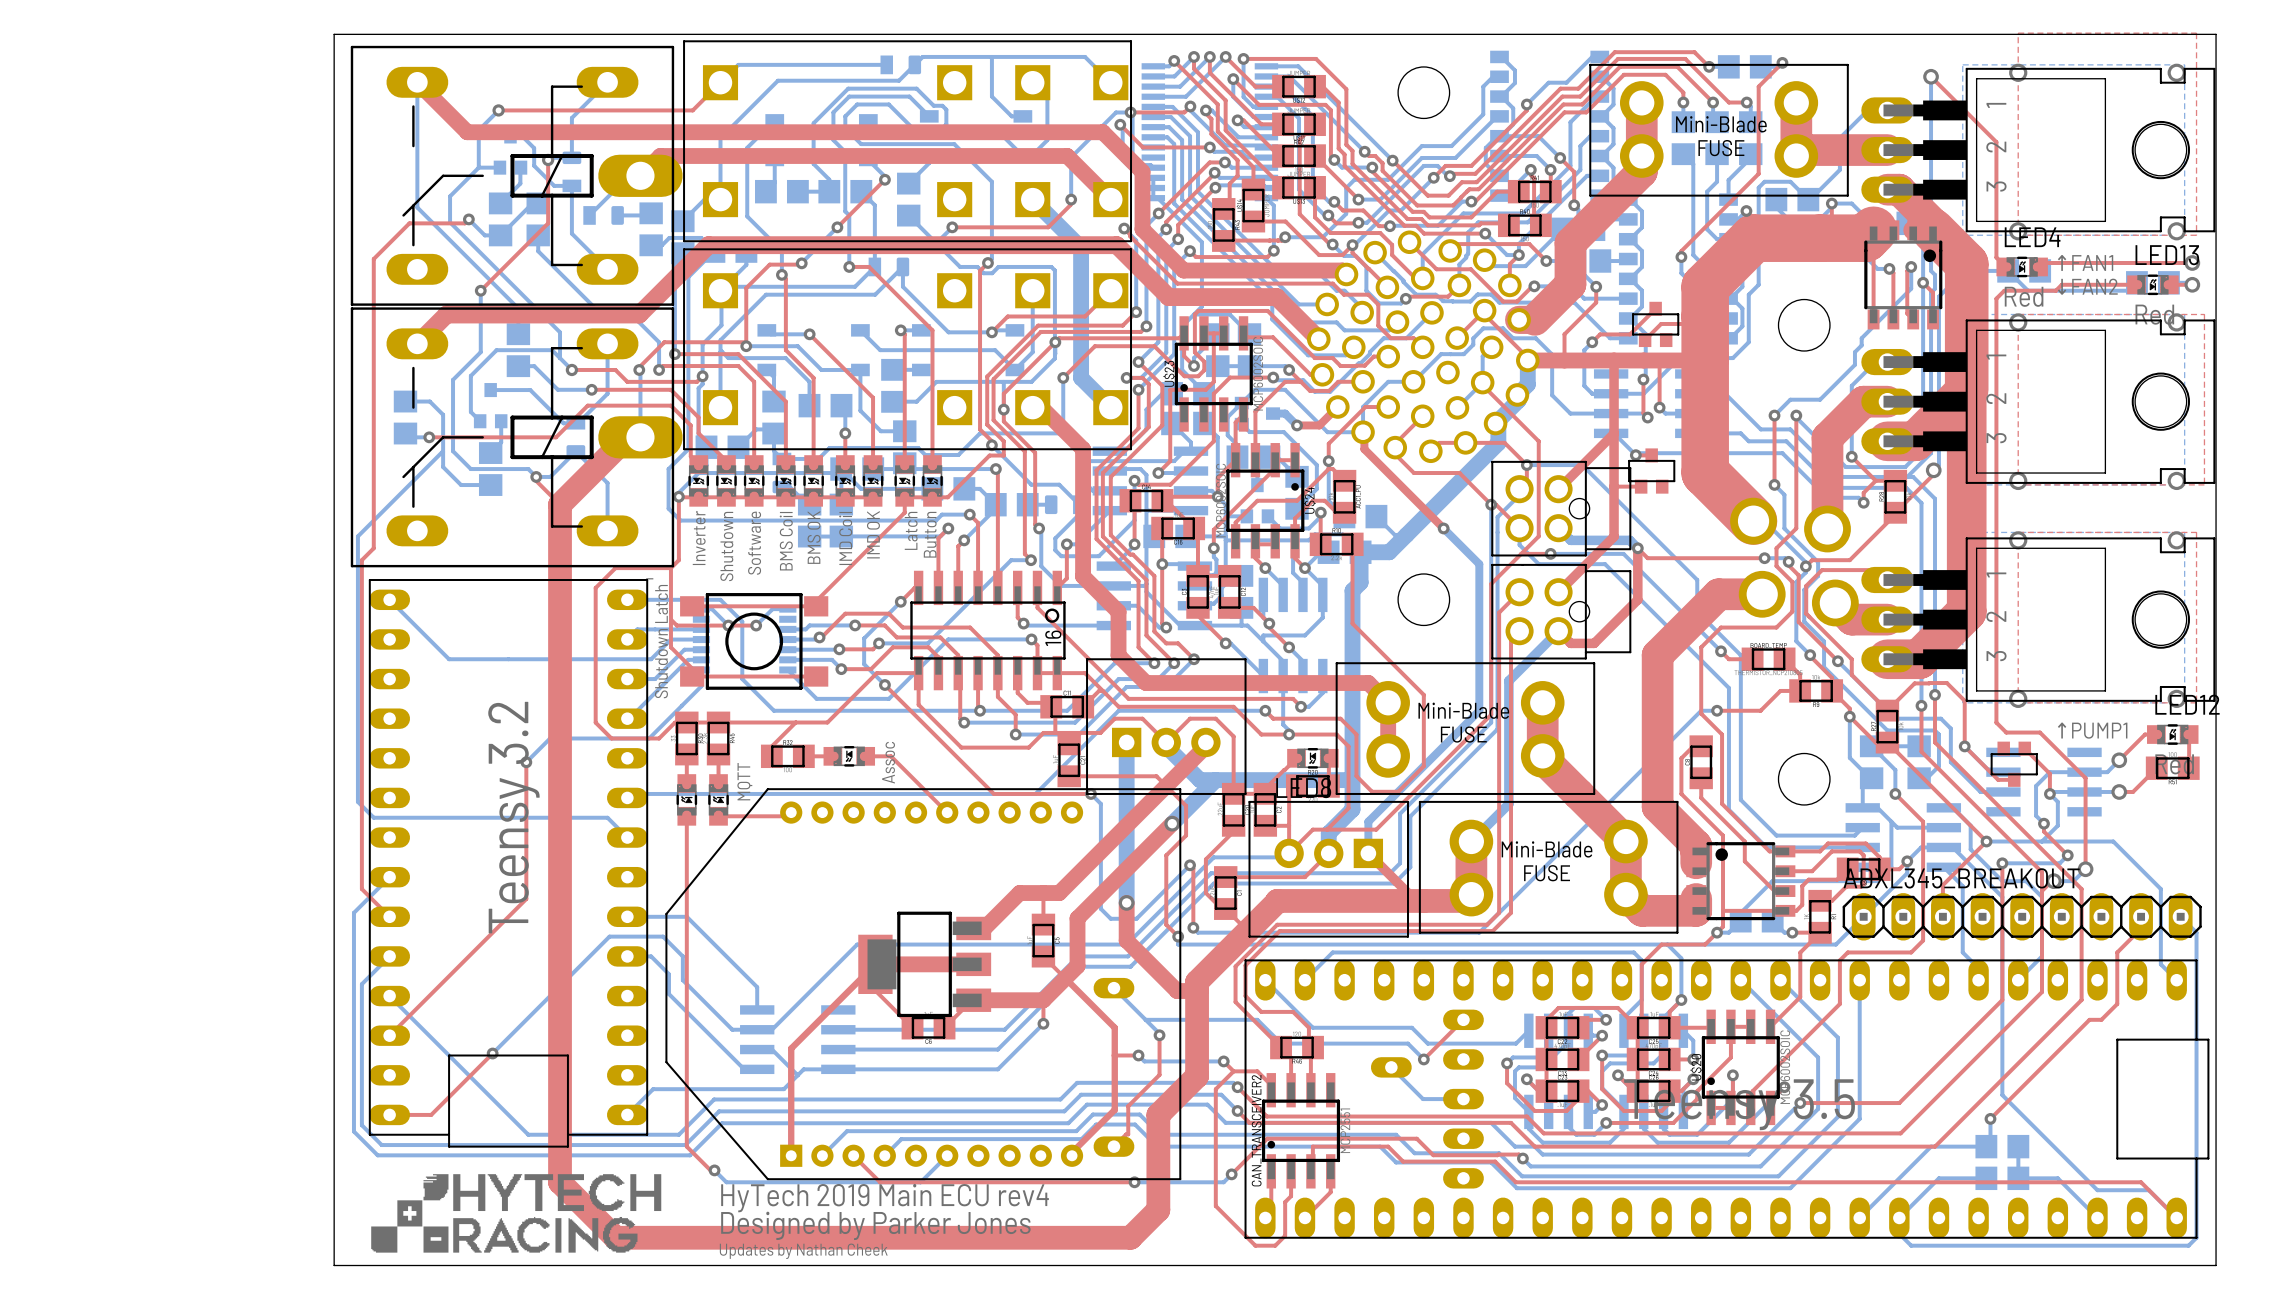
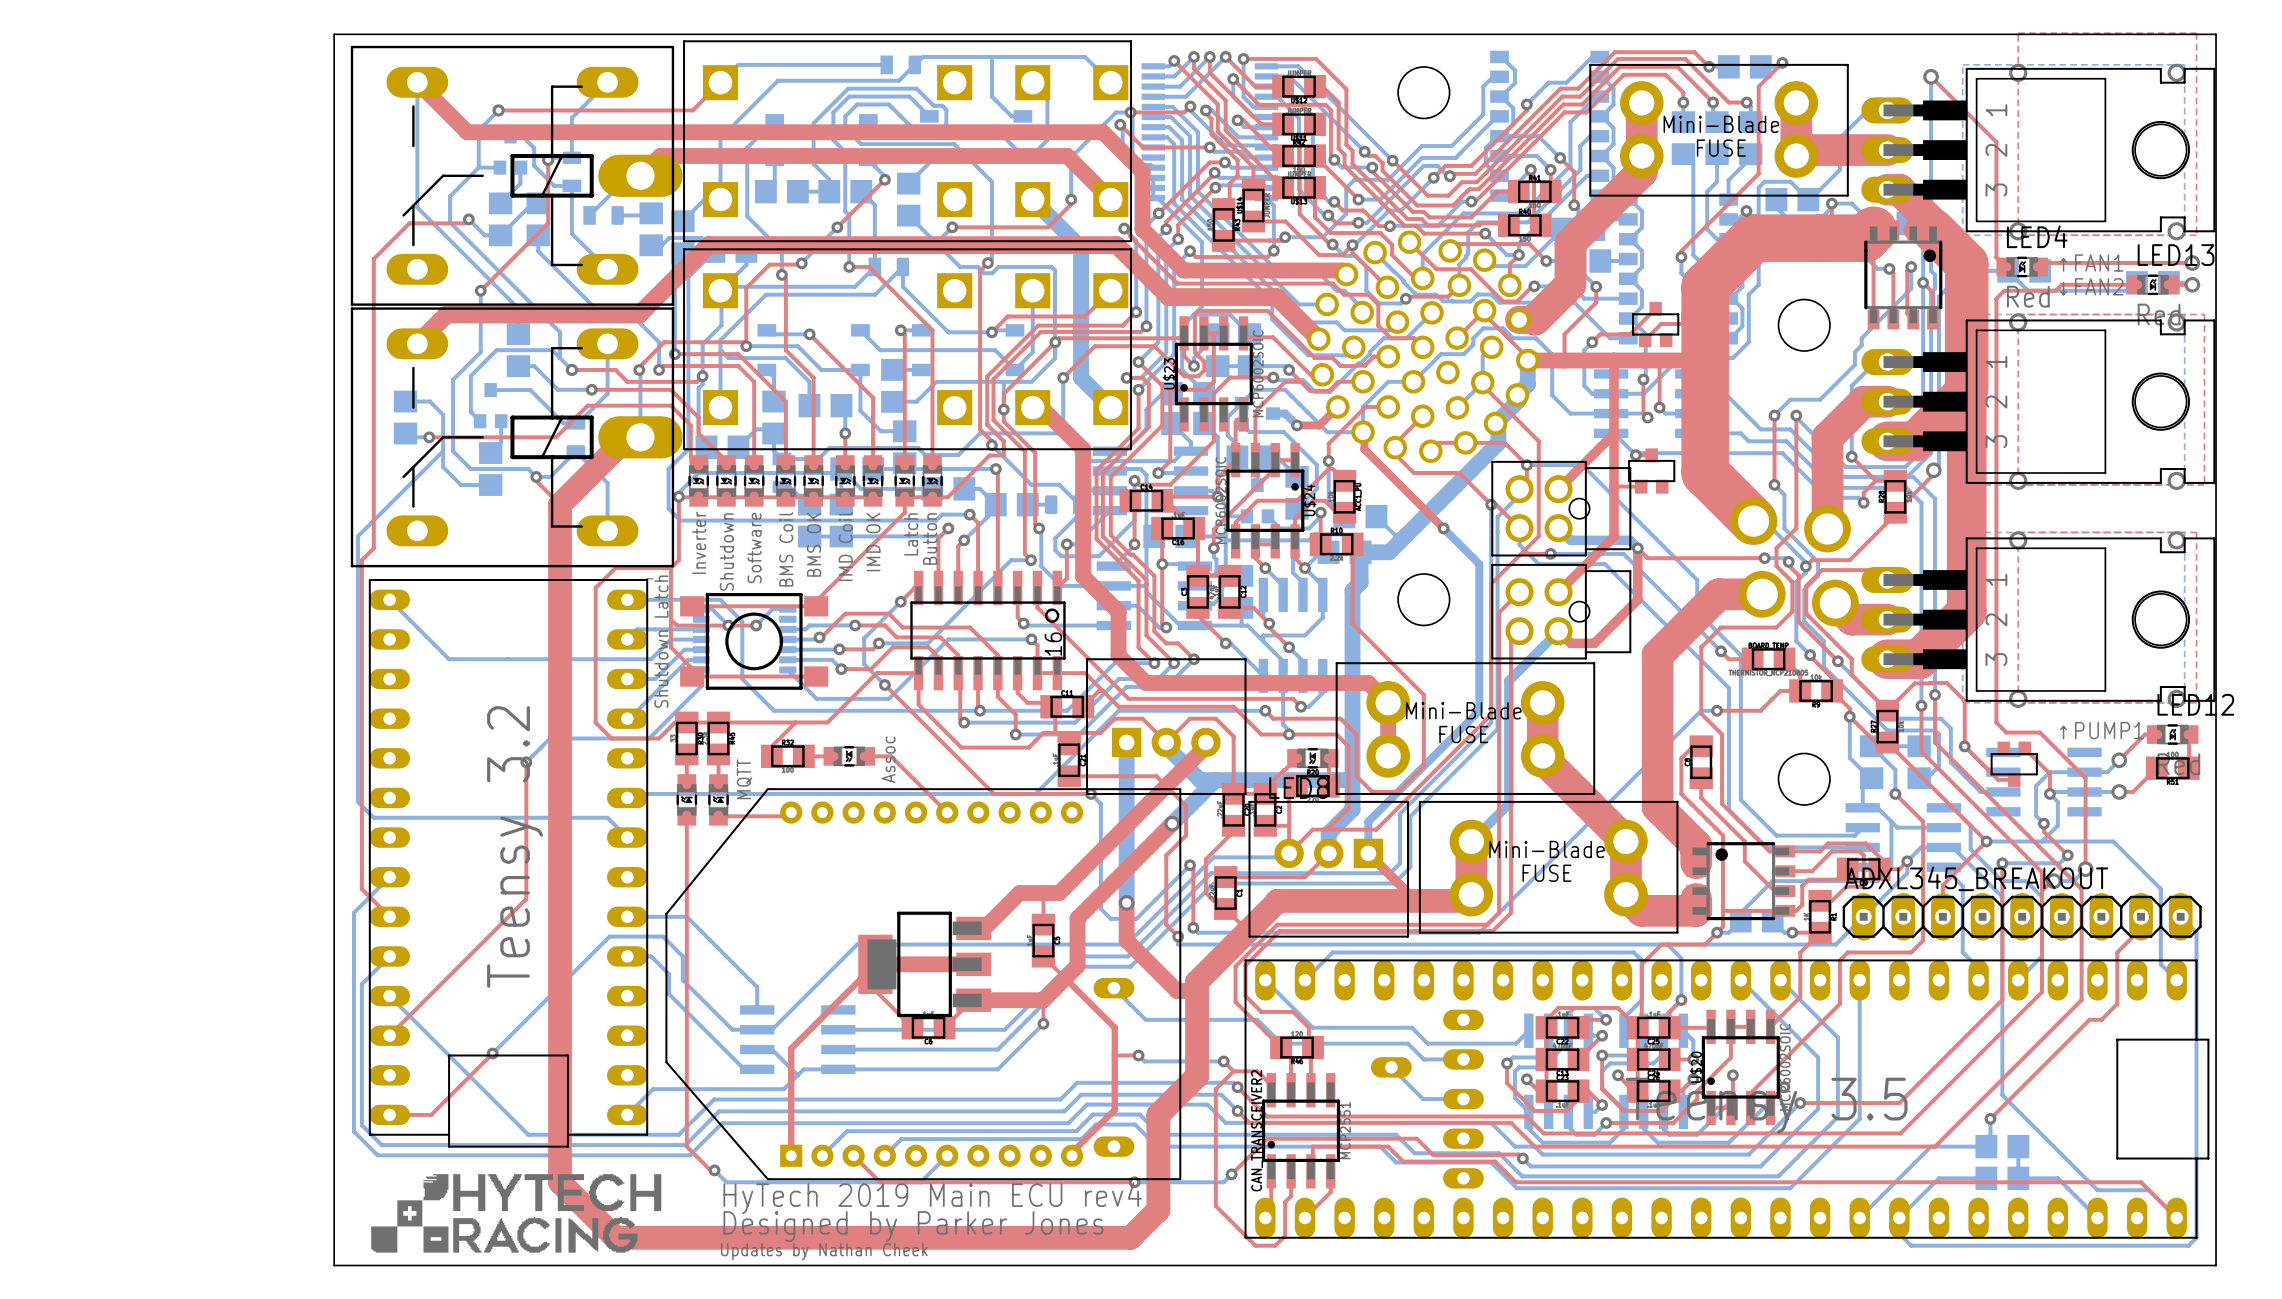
bottom track: (1145, 1019) (1159, 1035) -> none
top track: (1463, 1019) (1423, 1059) -> none
top track: (1159, 1035) (1159, 1074) (1128, 1106) (1128, 1134) (1113, 1146) -> none
via: (1159, 1035) -> none
bottom track: none -> (1423, 1059) (1463, 1059)
via: (1423, 1059) -> none

